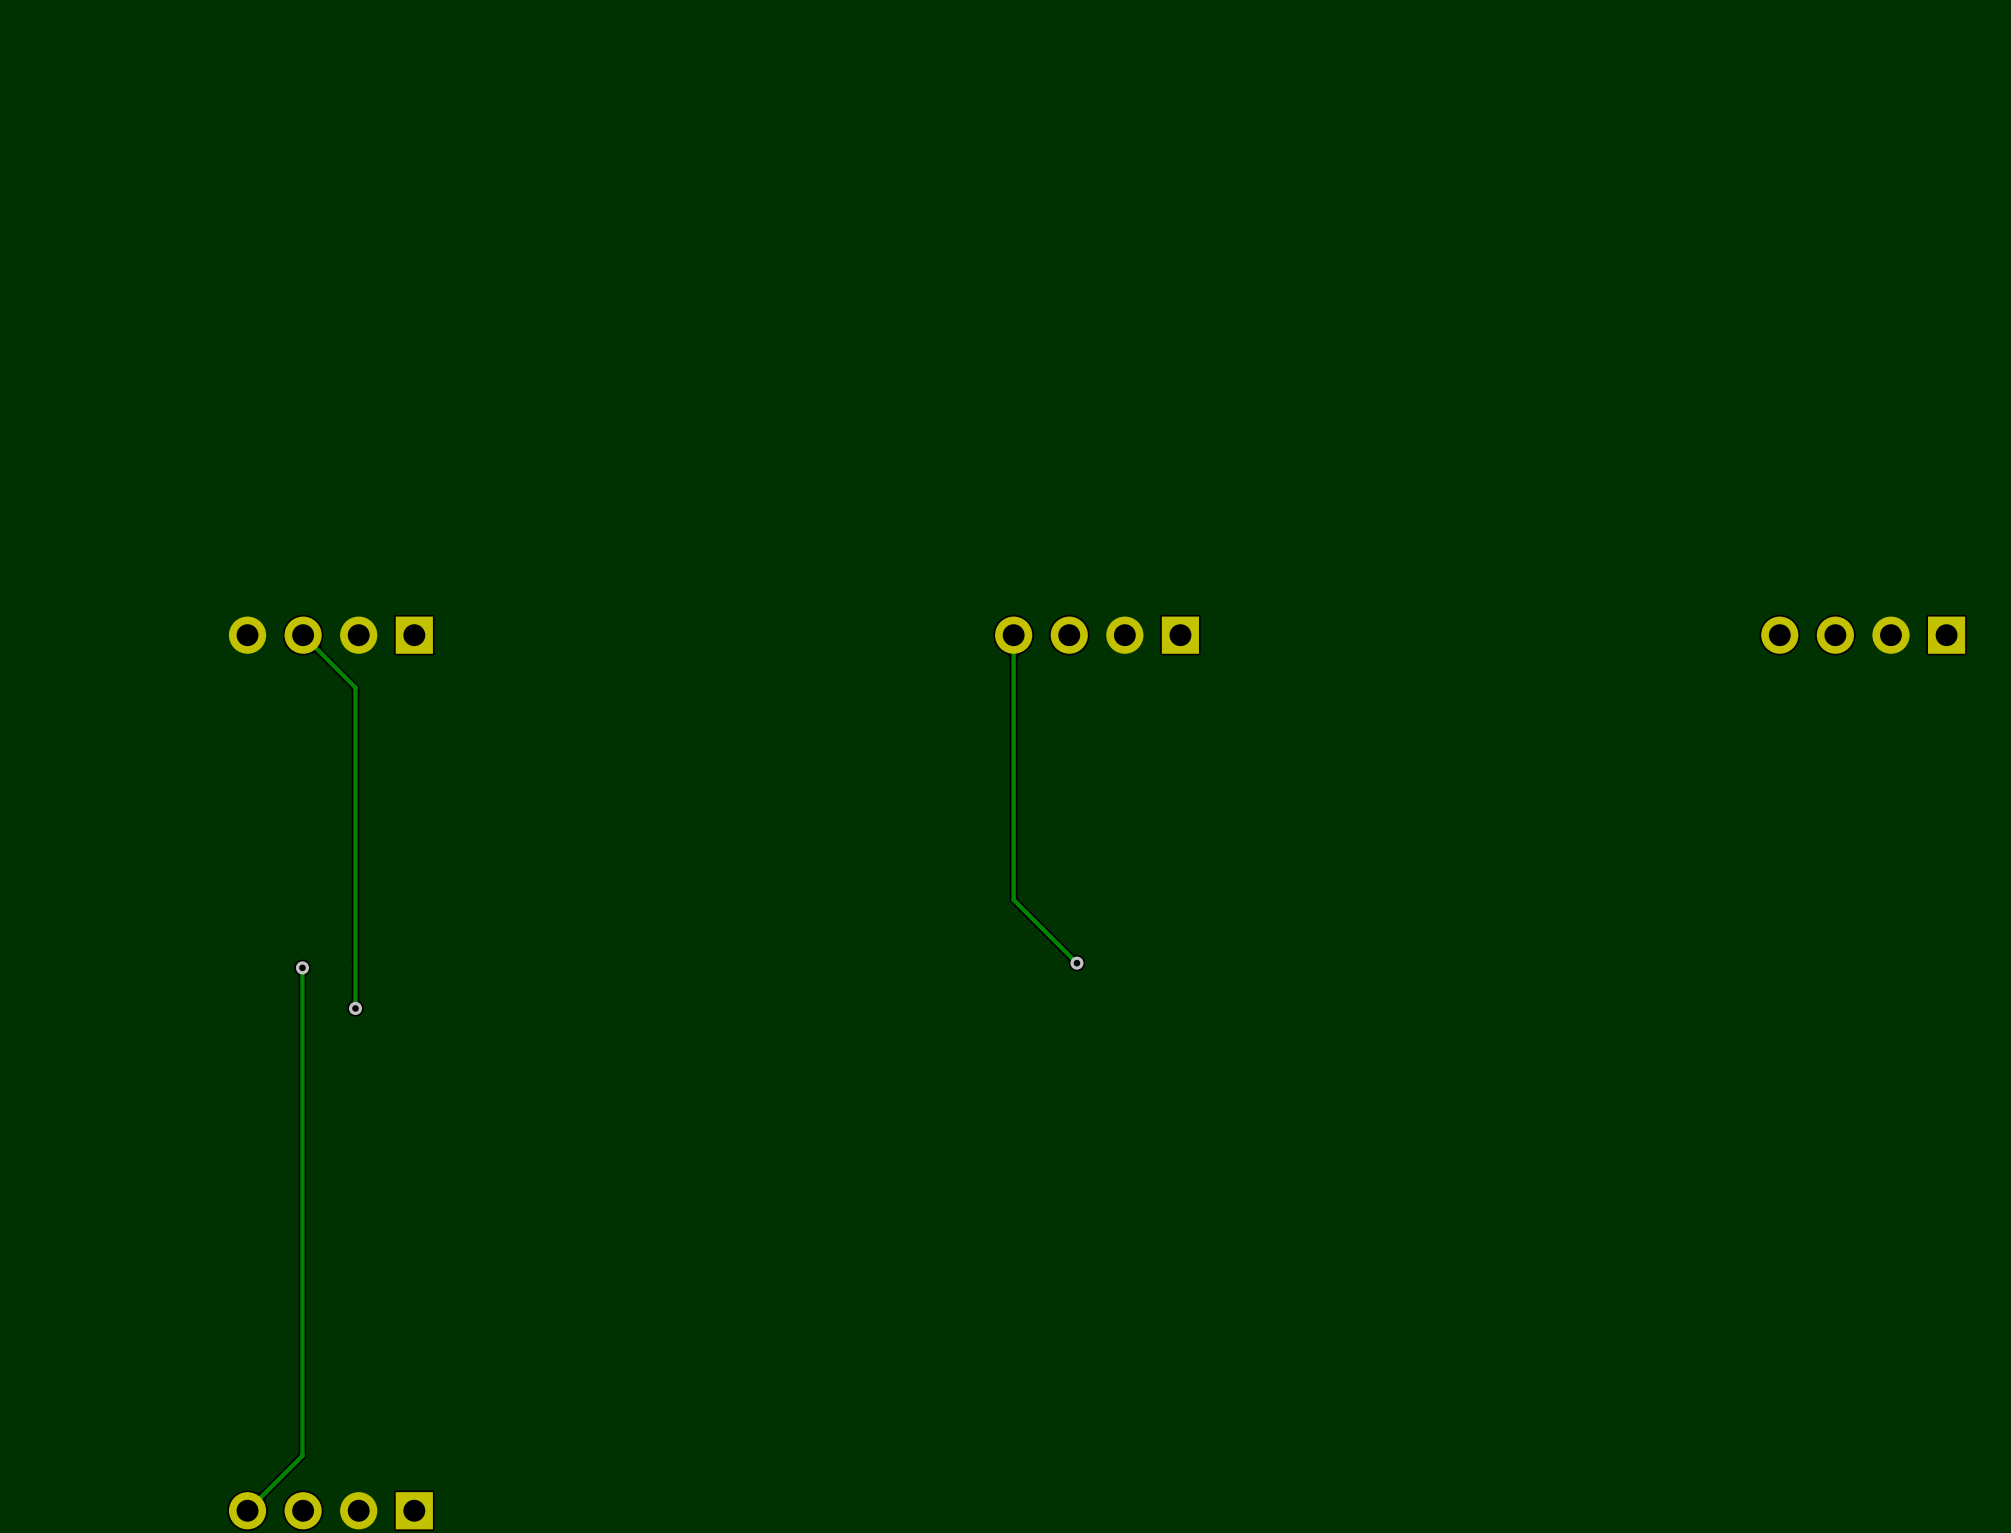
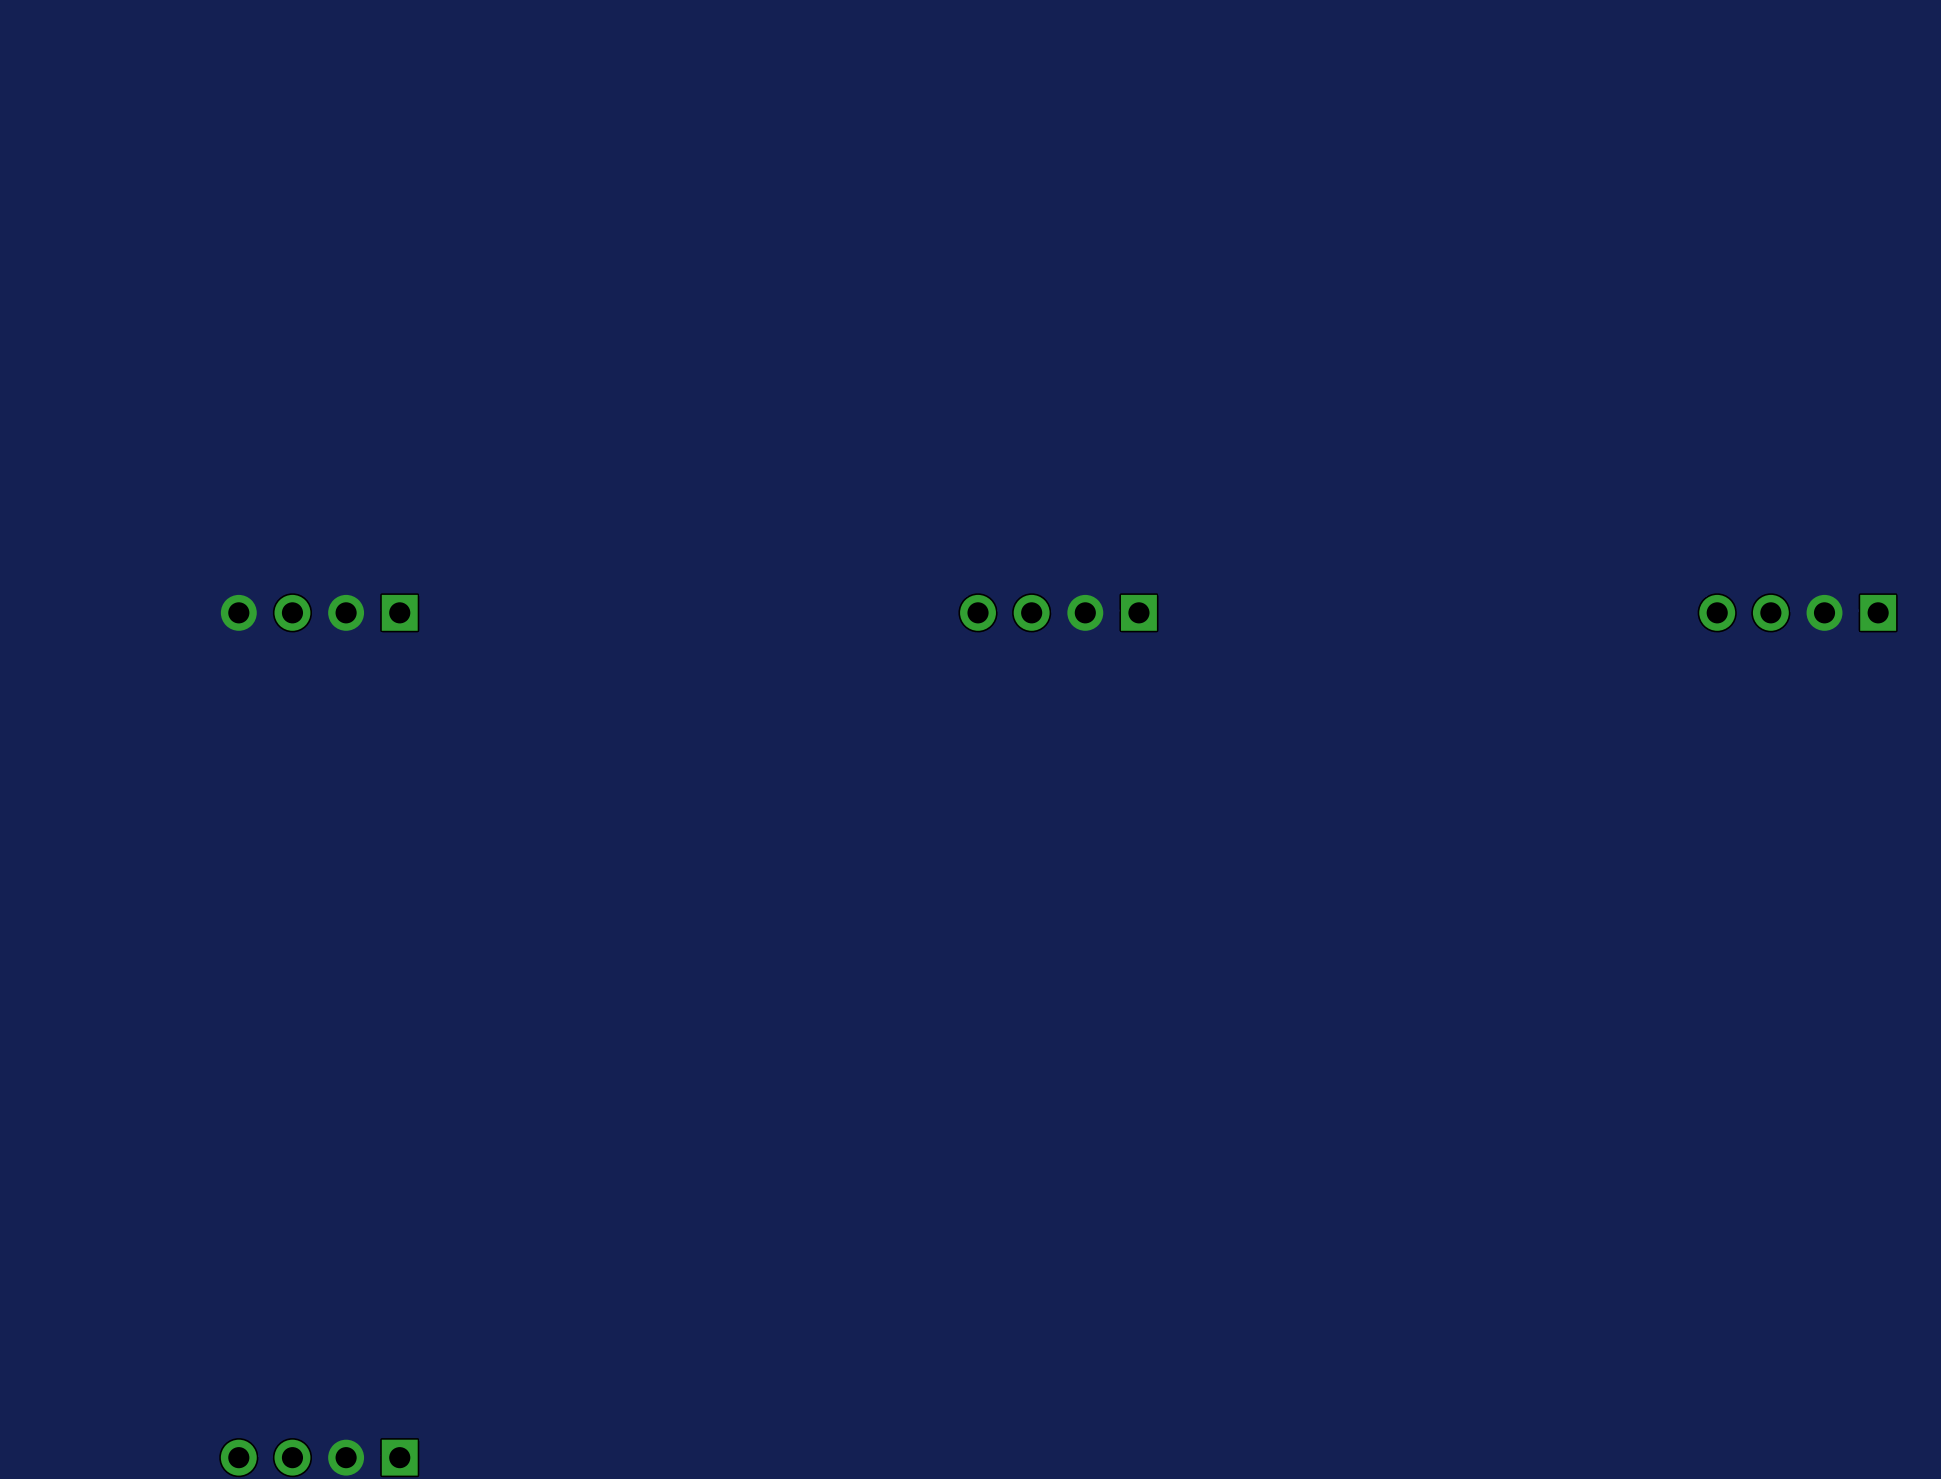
track: (303, 635) (355, 687) (355, 1008) -> none
track: (1013, 635) (1013, 899) (1076, 963) -> none
via: (1076, 963) -> none
track: (302, 967) (302, 1455) (247, 1510) -> none
via: (302, 967) -> none
via: (355, 1008) -> none

